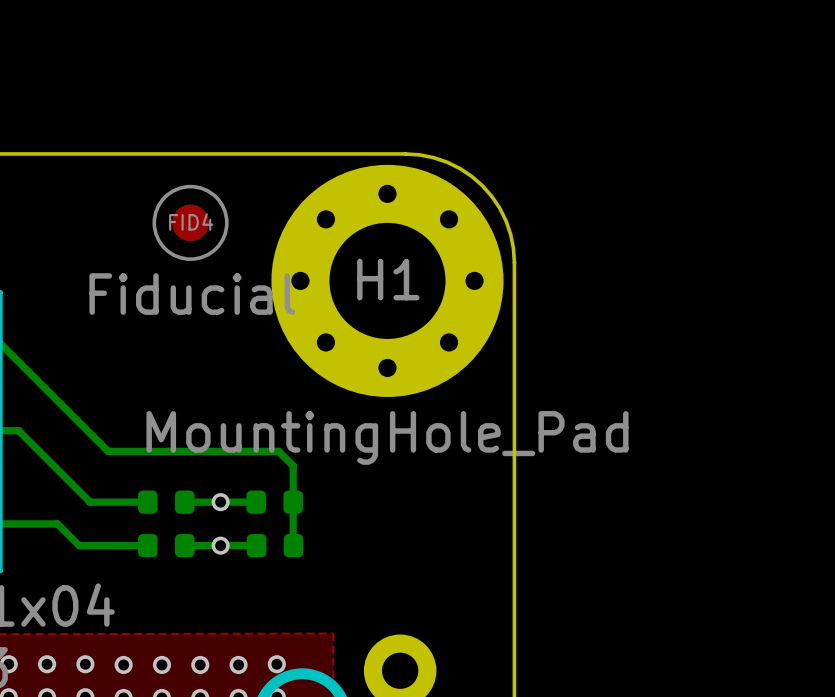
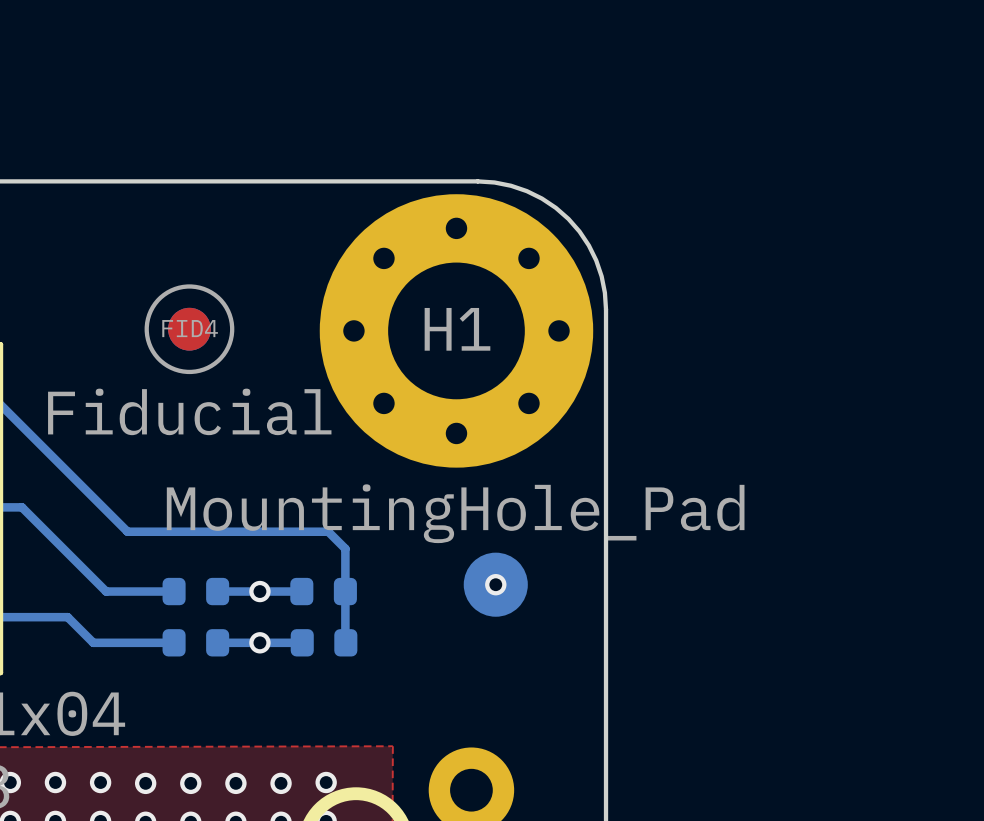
FID4 position: (190, 222) -> (189, 329)
part: none -> (495, 584)
via: none -> (495, 584)

